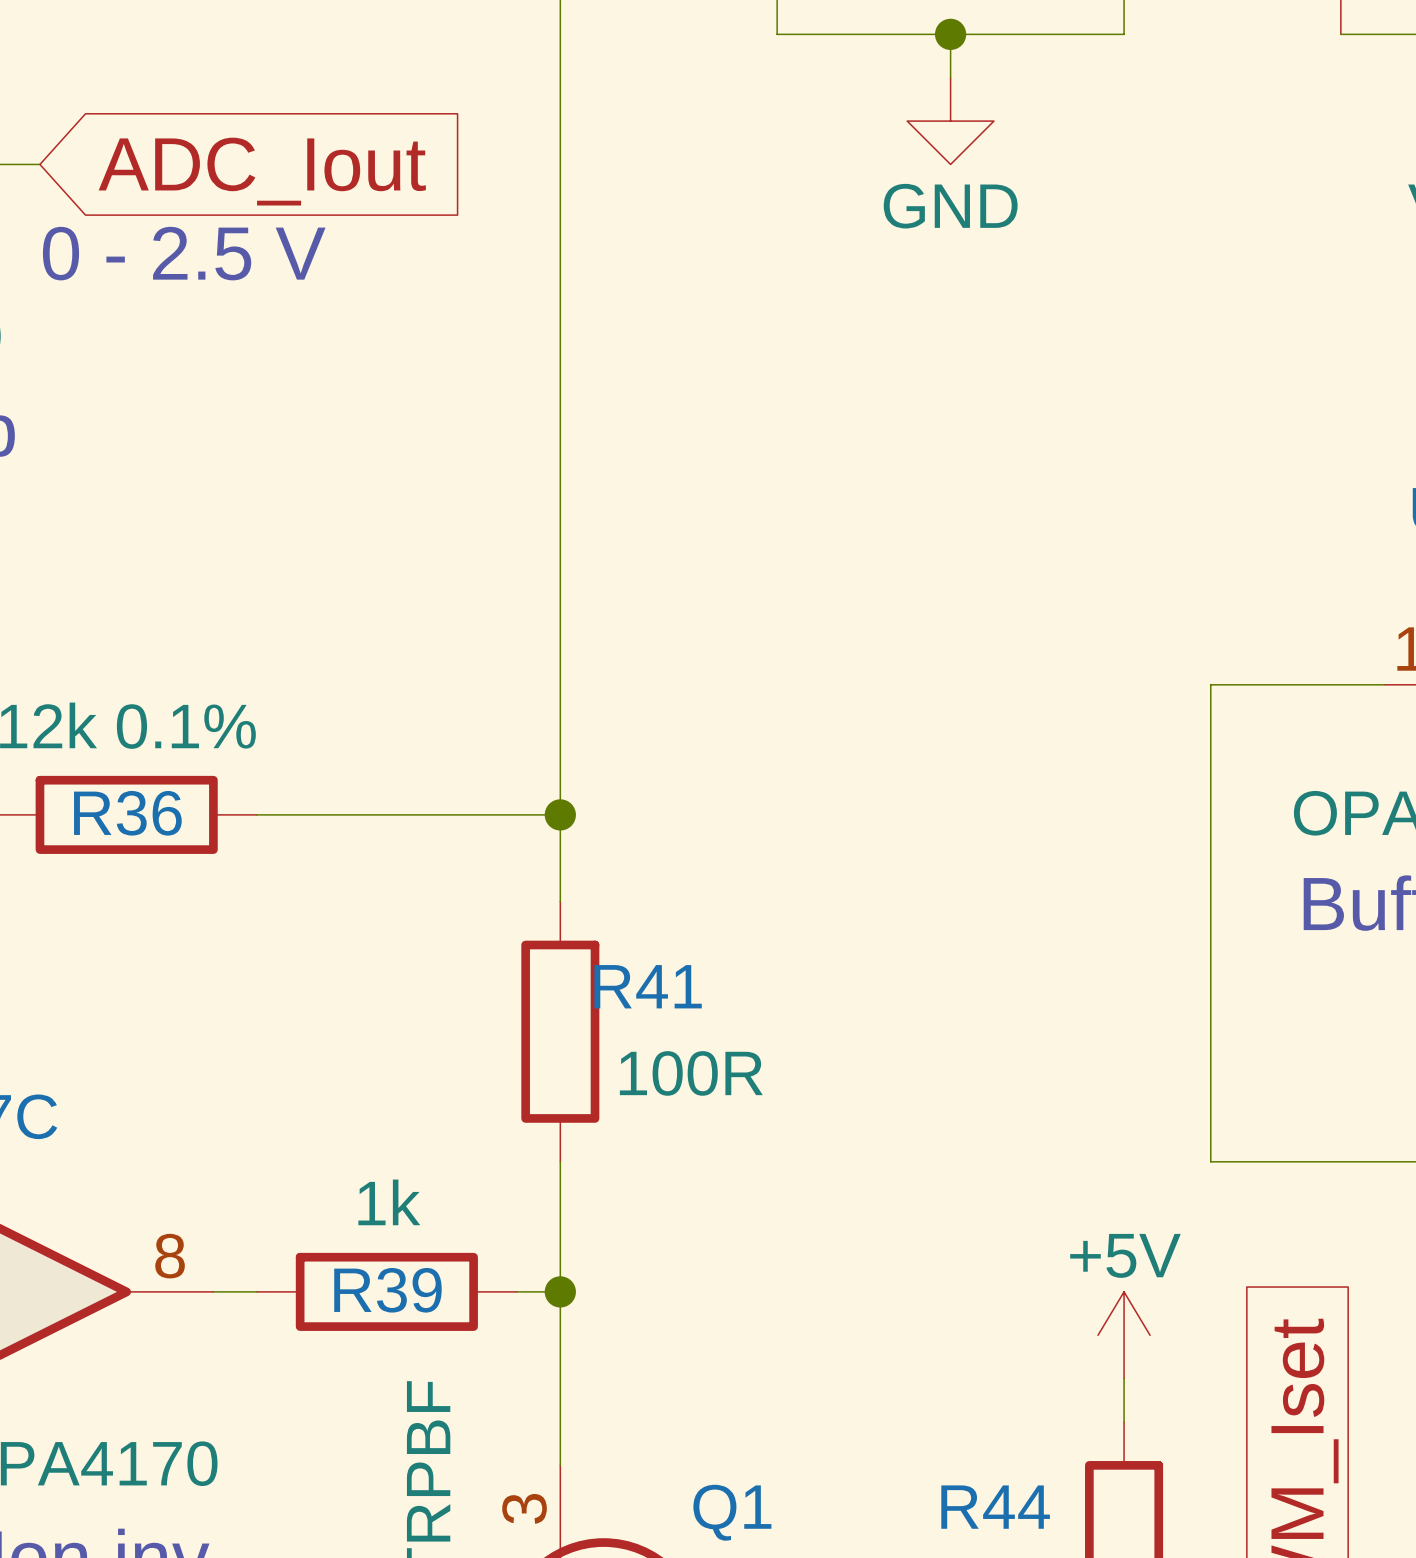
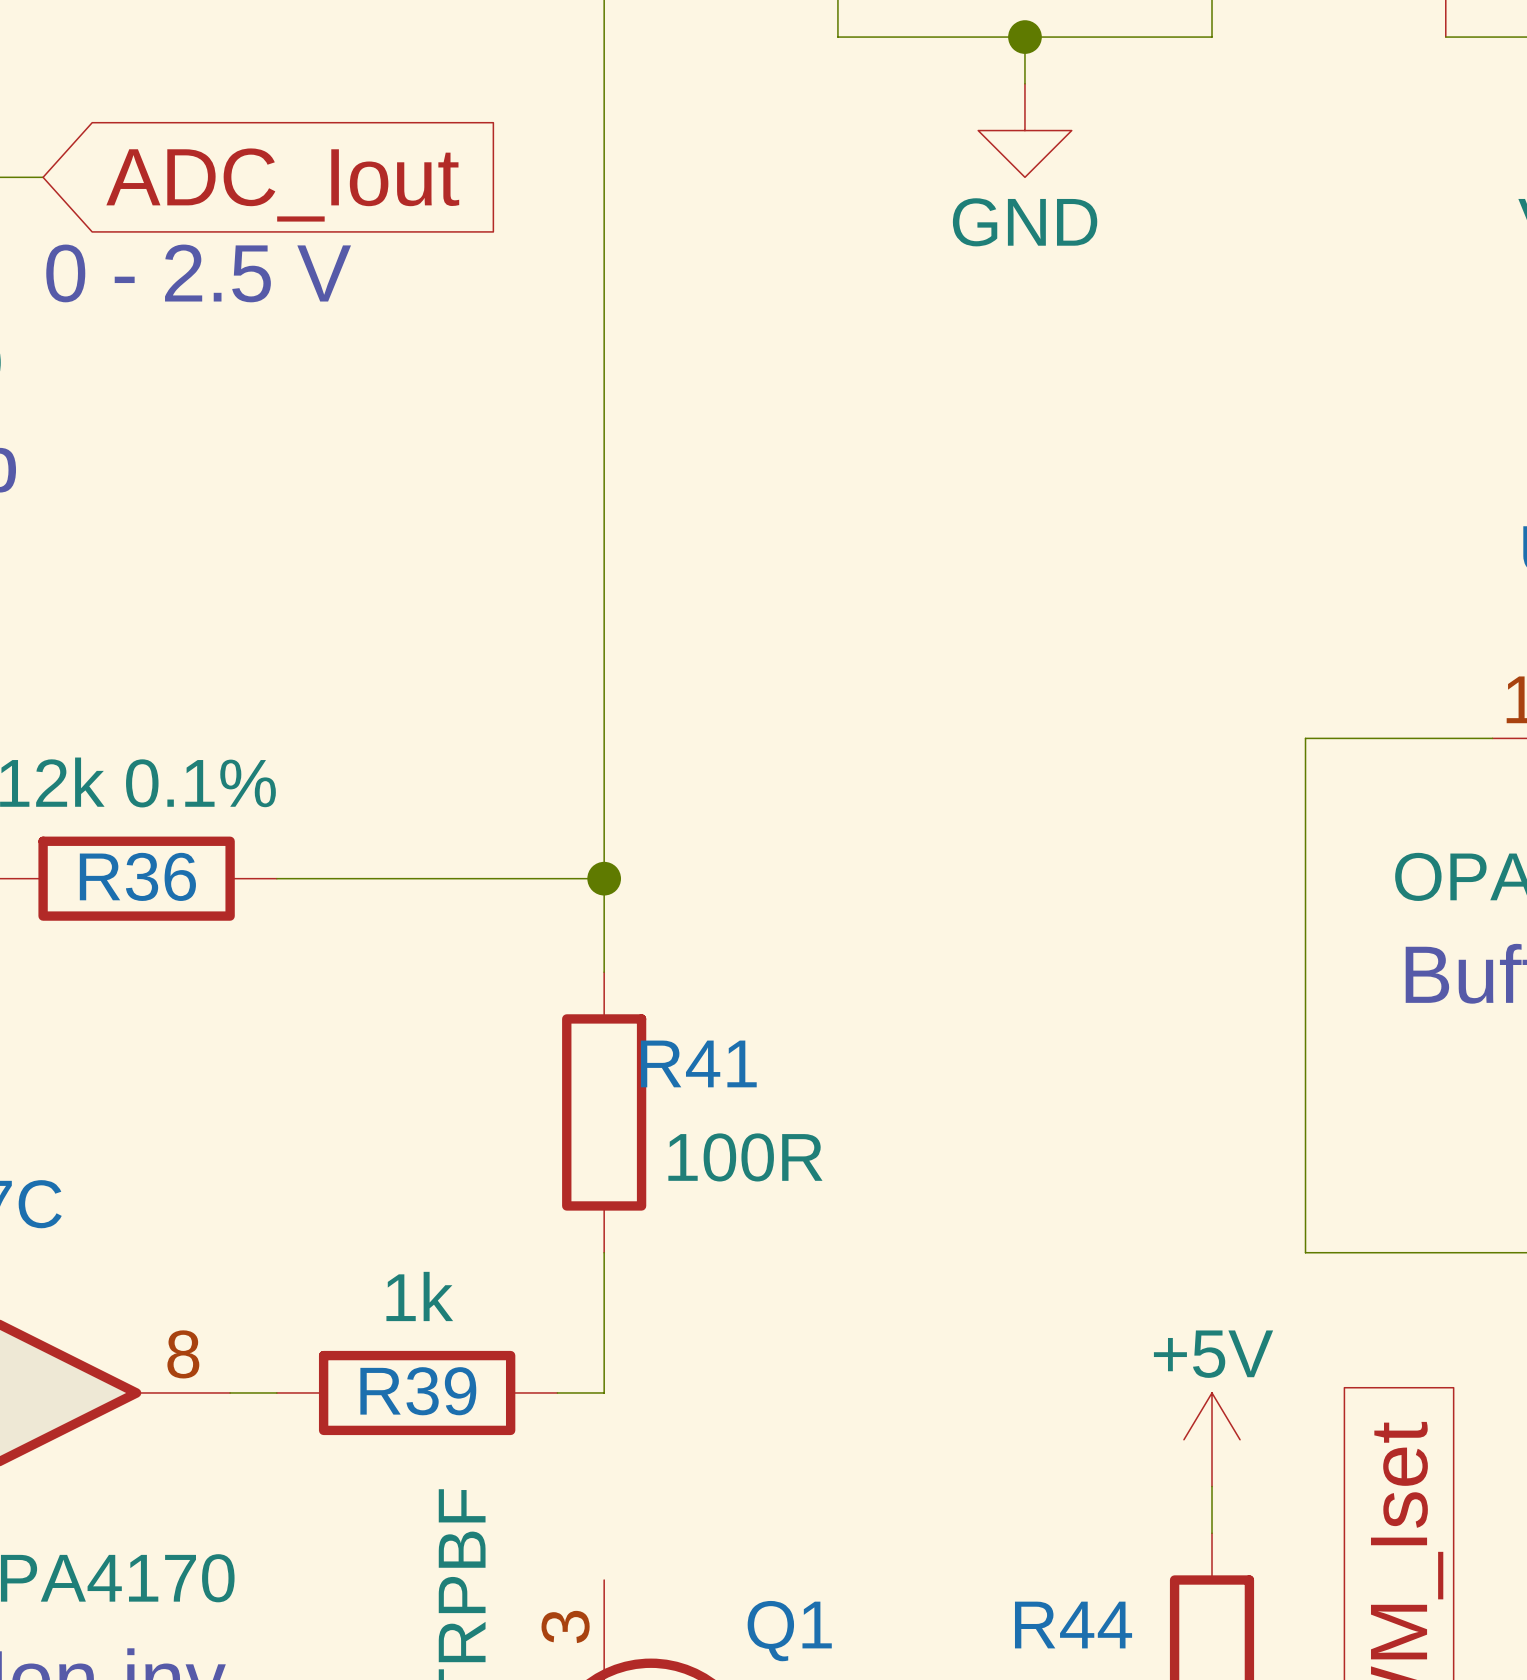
wire: (560, 1291) (560, 1465) -> none
junction: (560, 1291) -> none

